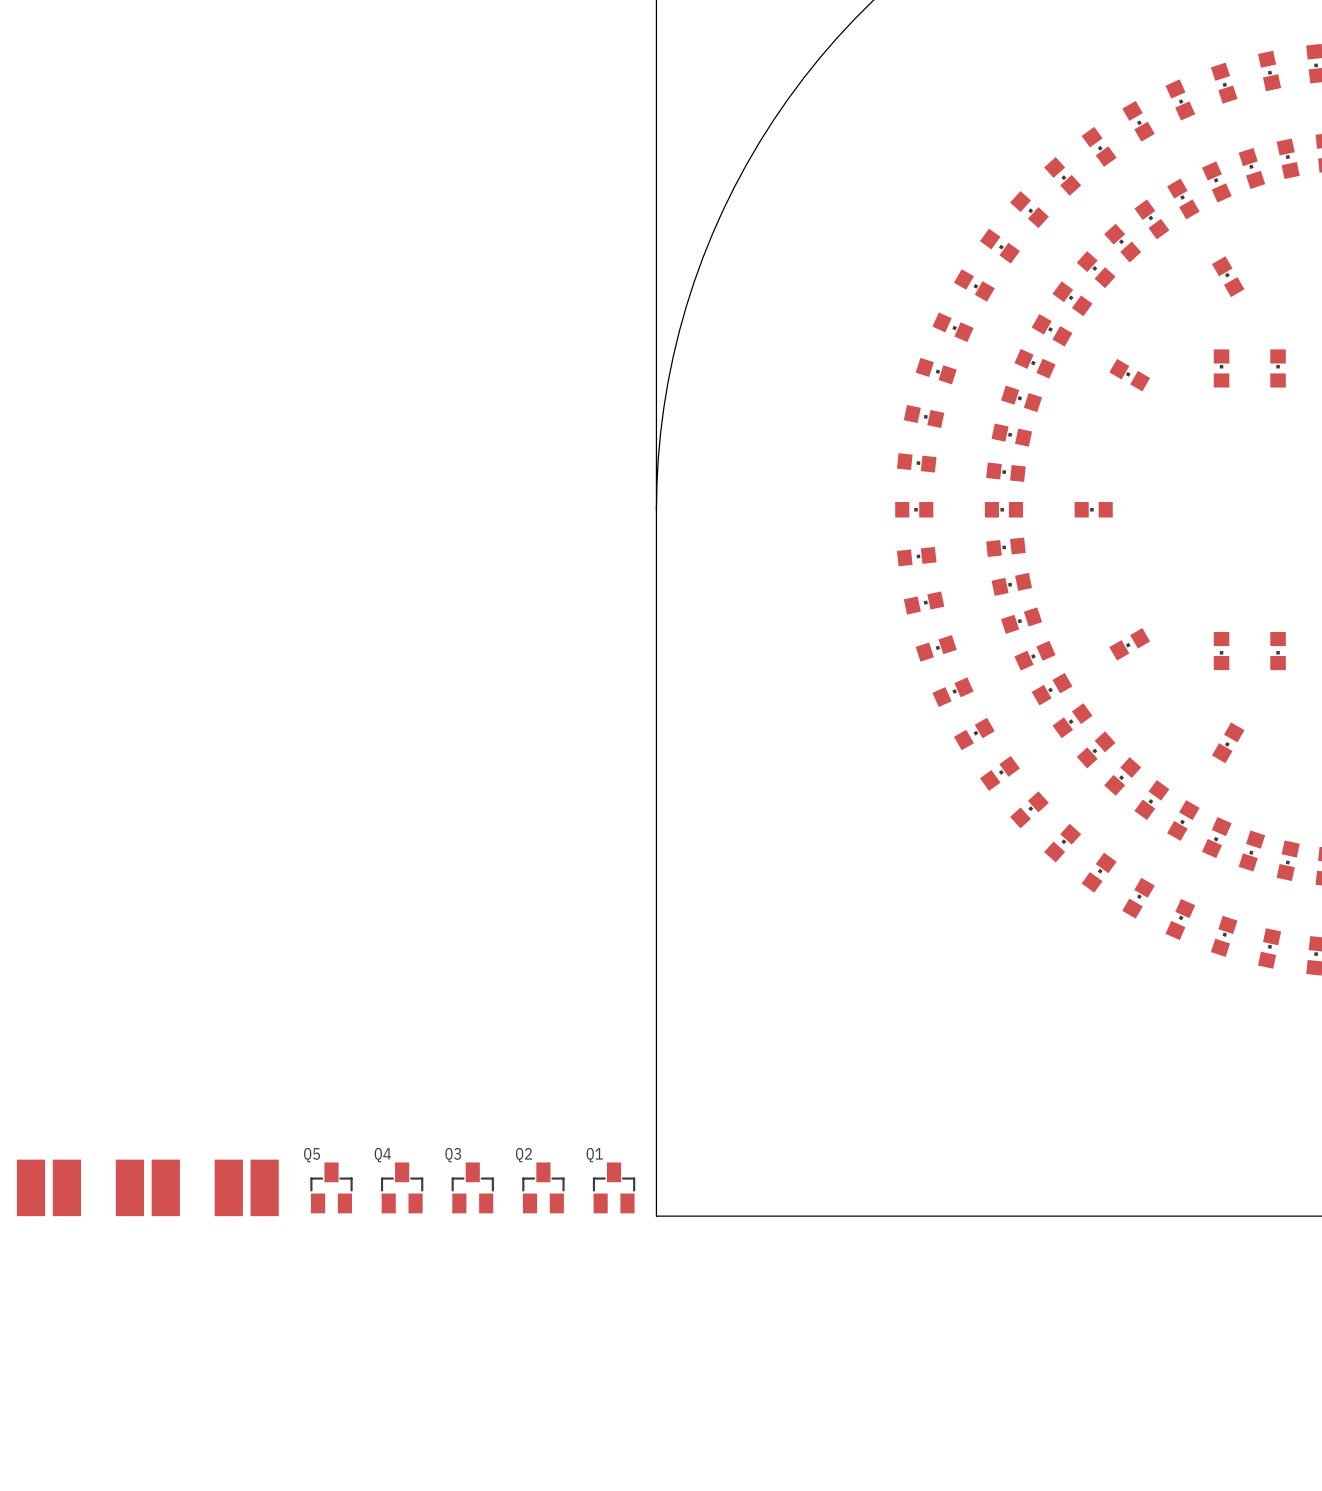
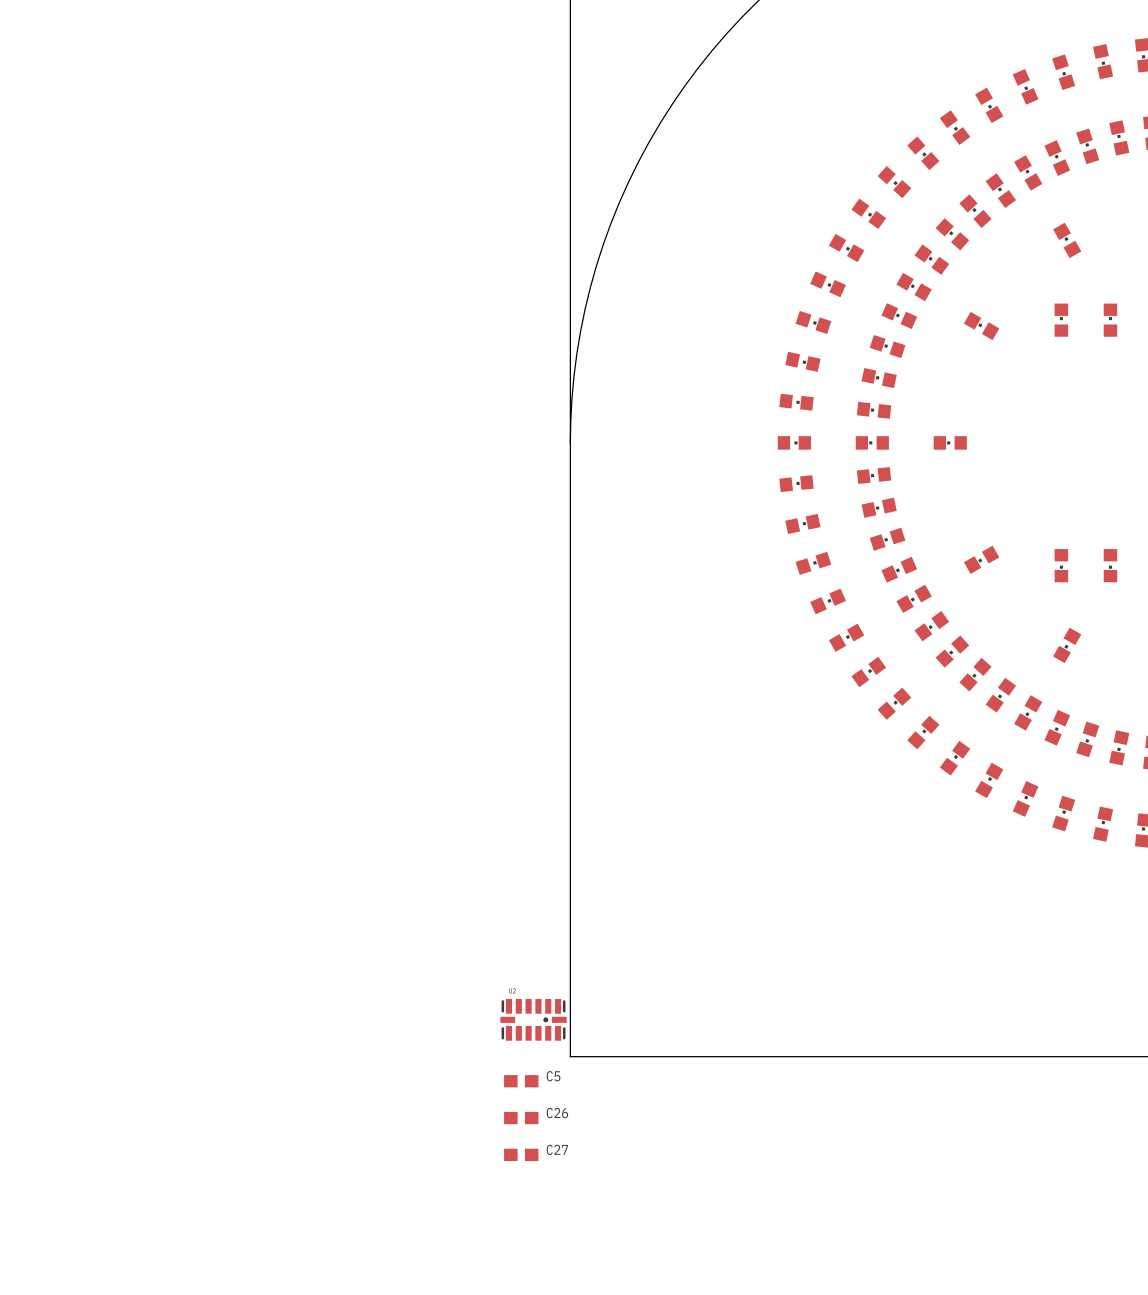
part: none -> (533, 1019)
part: (48, 1187) -> none
part: (147, 1187) -> none
part: (246, 1187) -> none
Q5: (331, 1187) -> none
Q4: (402, 1187) -> none
Q3: (472, 1187) -> none
Q2: (543, 1187) -> none
Q1: (614, 1187) -> none
C5: none -> (521, 1081)
C26: none -> (521, 1118)
C27: none -> (521, 1154)

